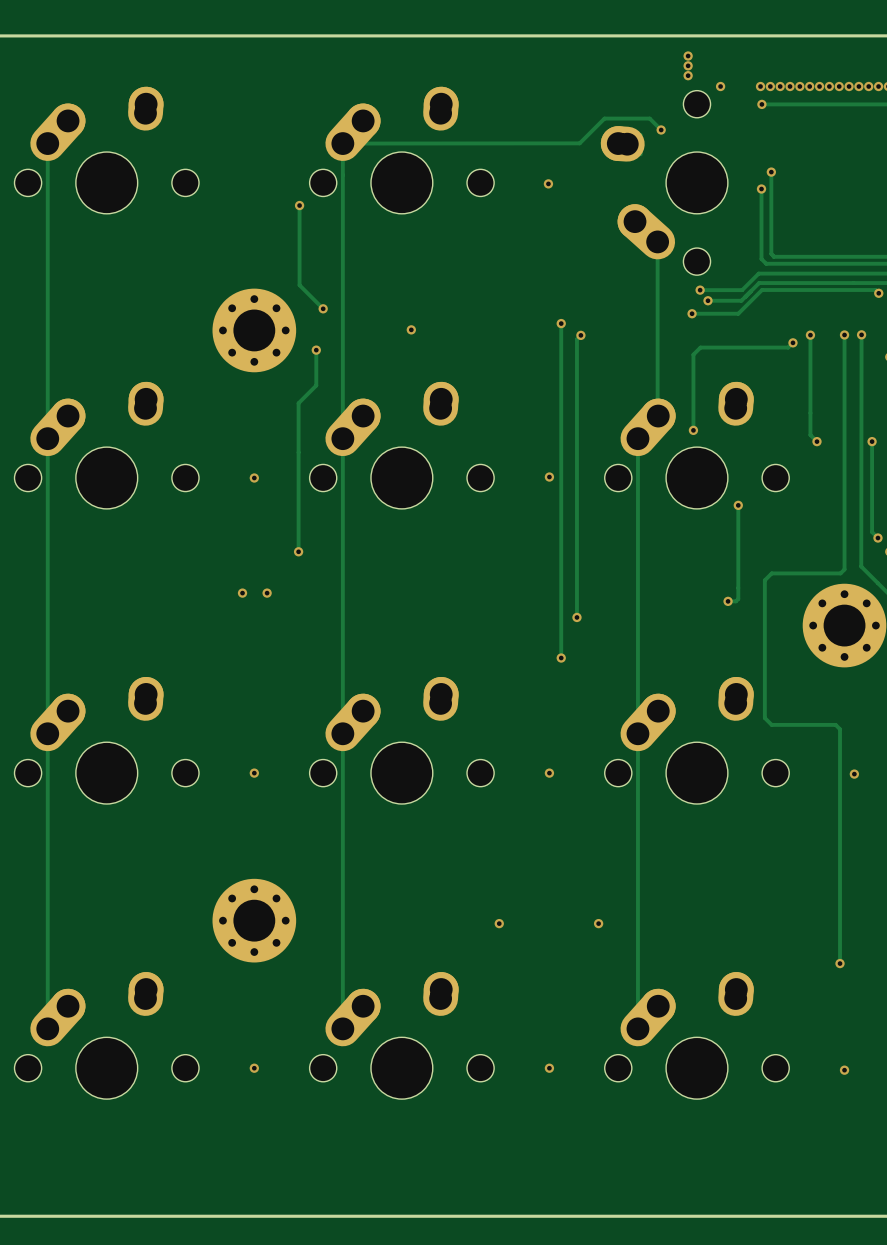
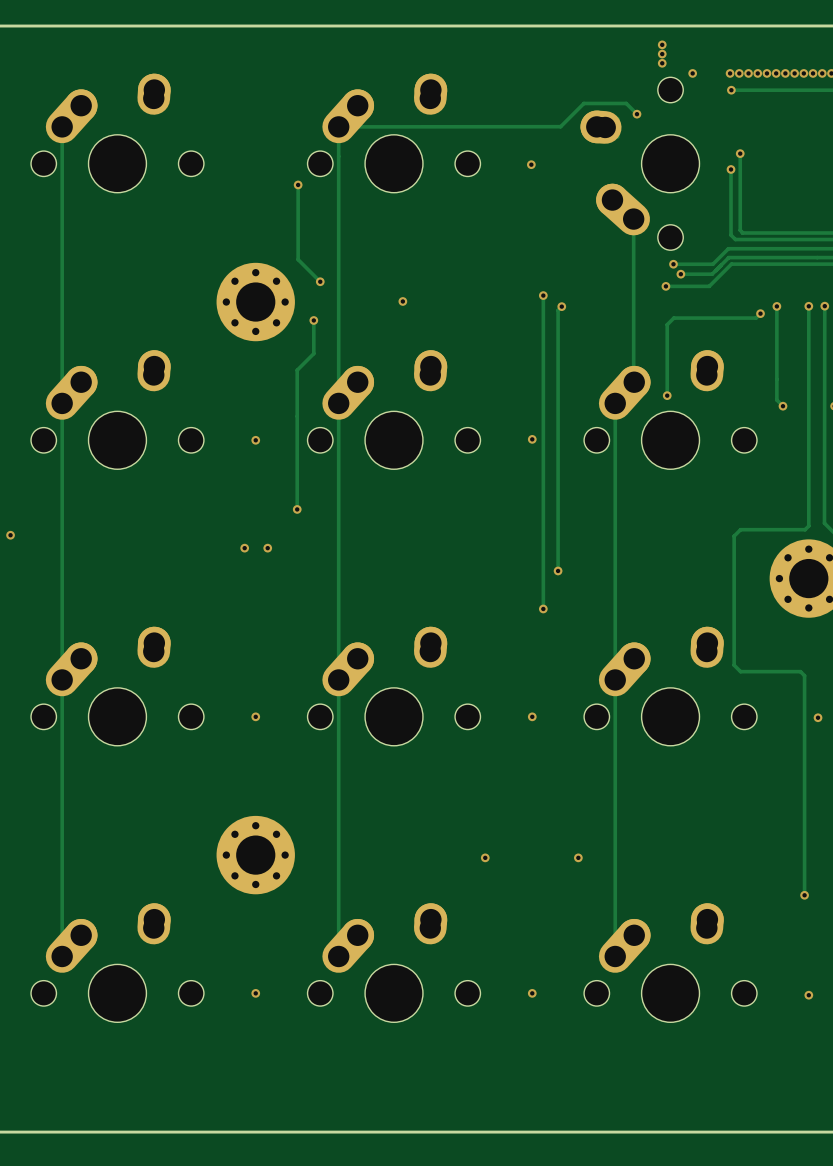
track: (738, 505) (738, 599) (735, 601) (728, 601) -> none
via: (738, 505) -> none
via: (728, 601) -> none

